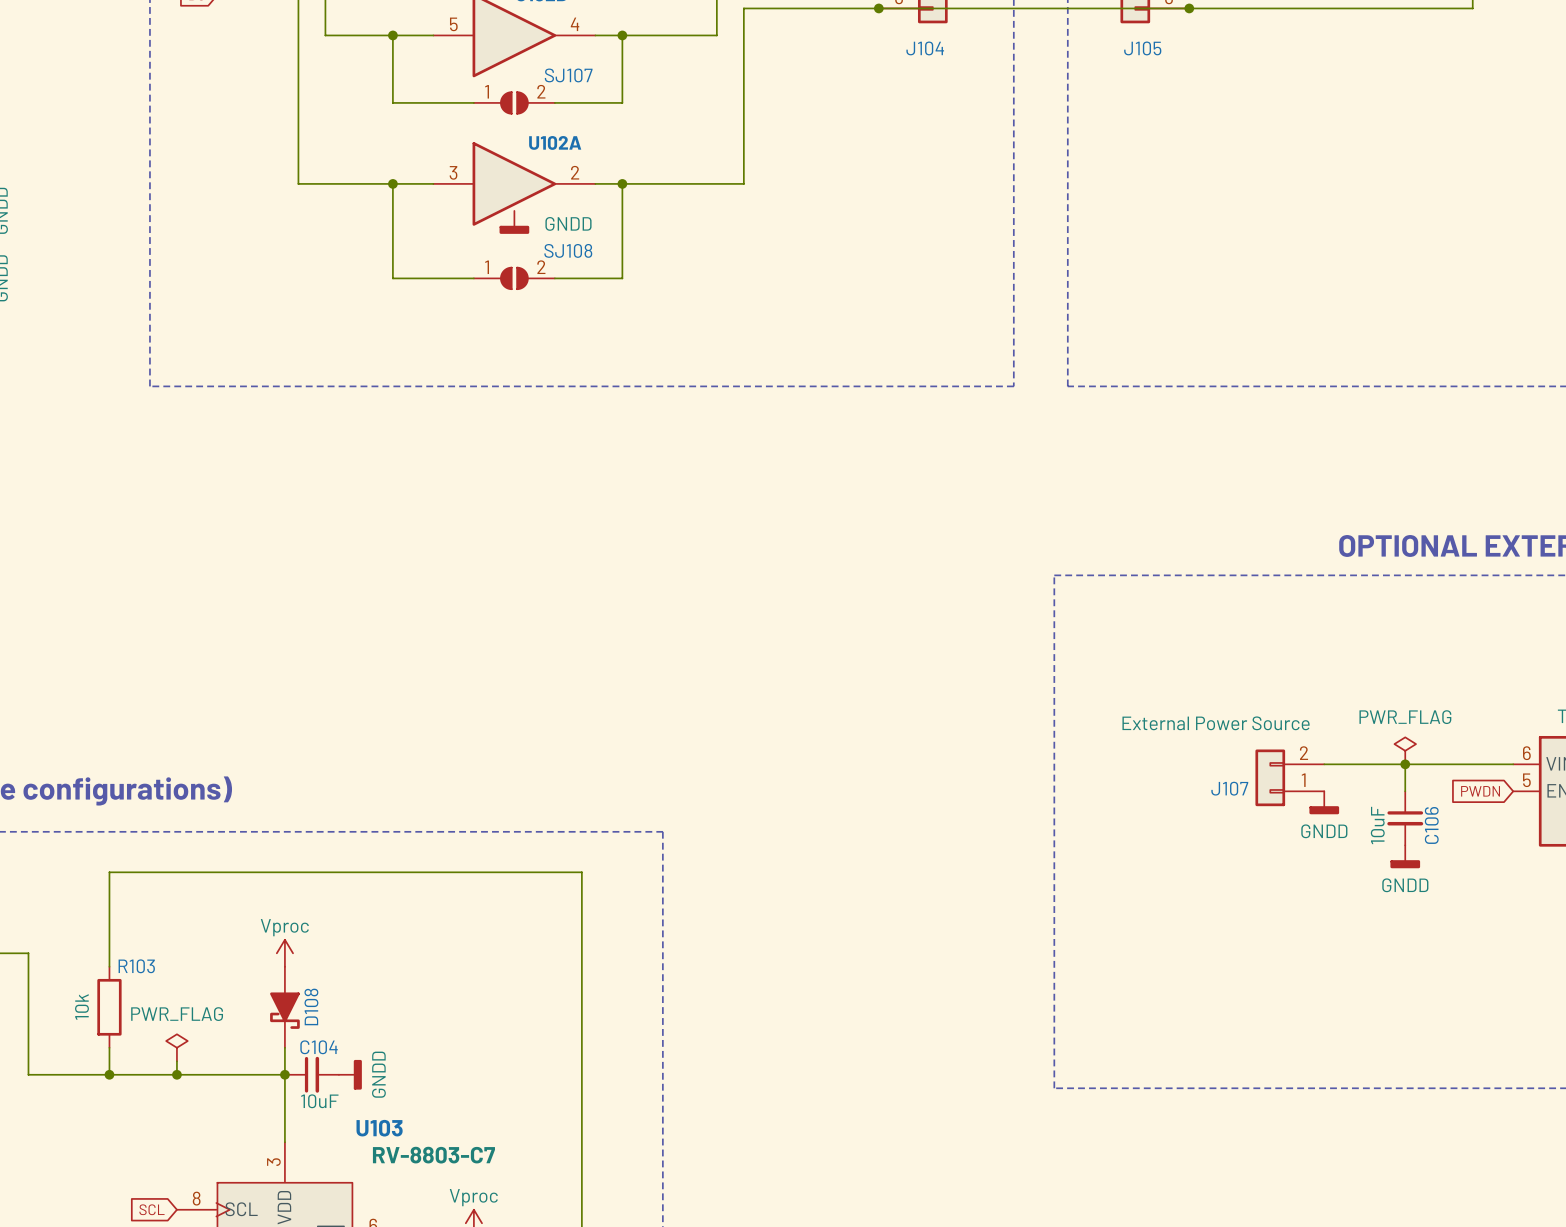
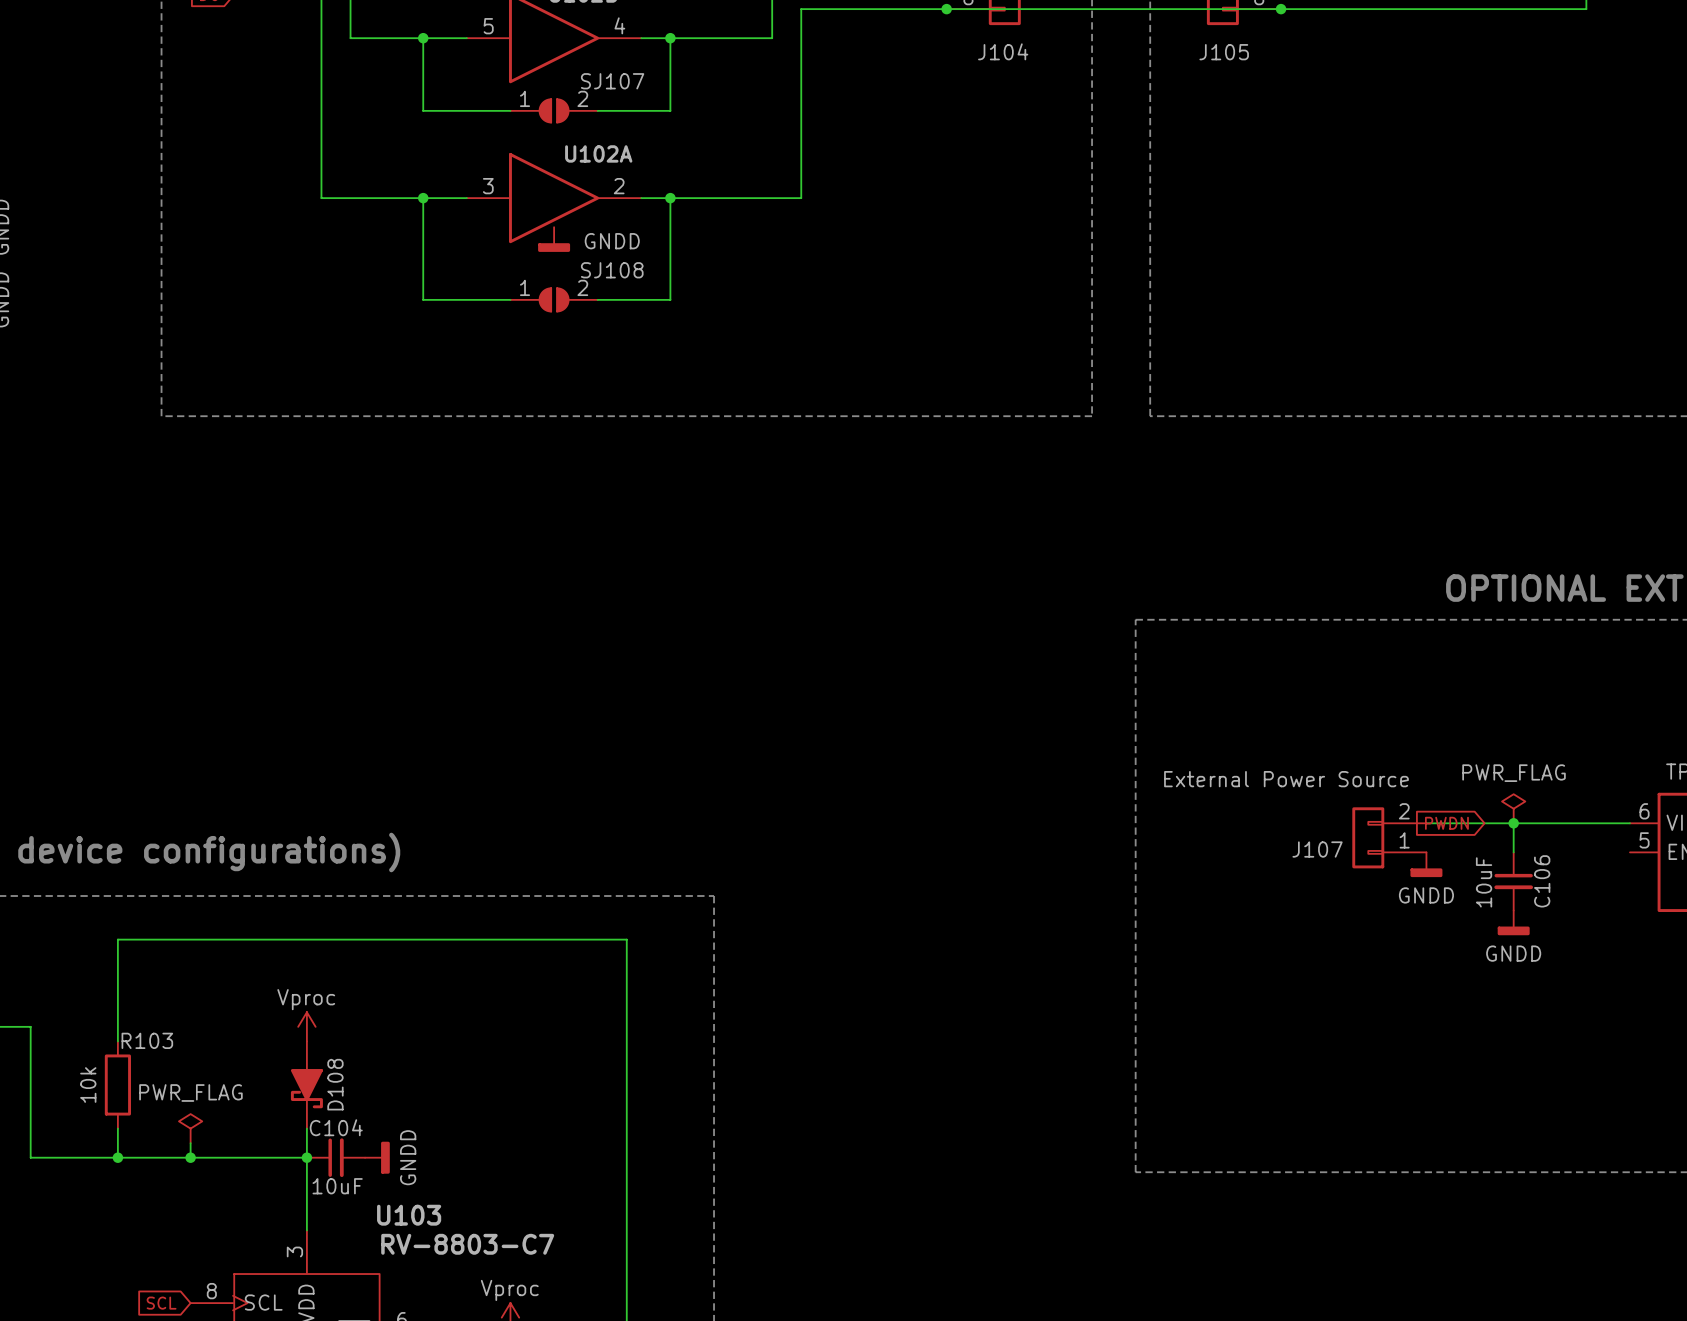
global label position: PWDN (1480, 791) -> PWDN (1446, 823)

